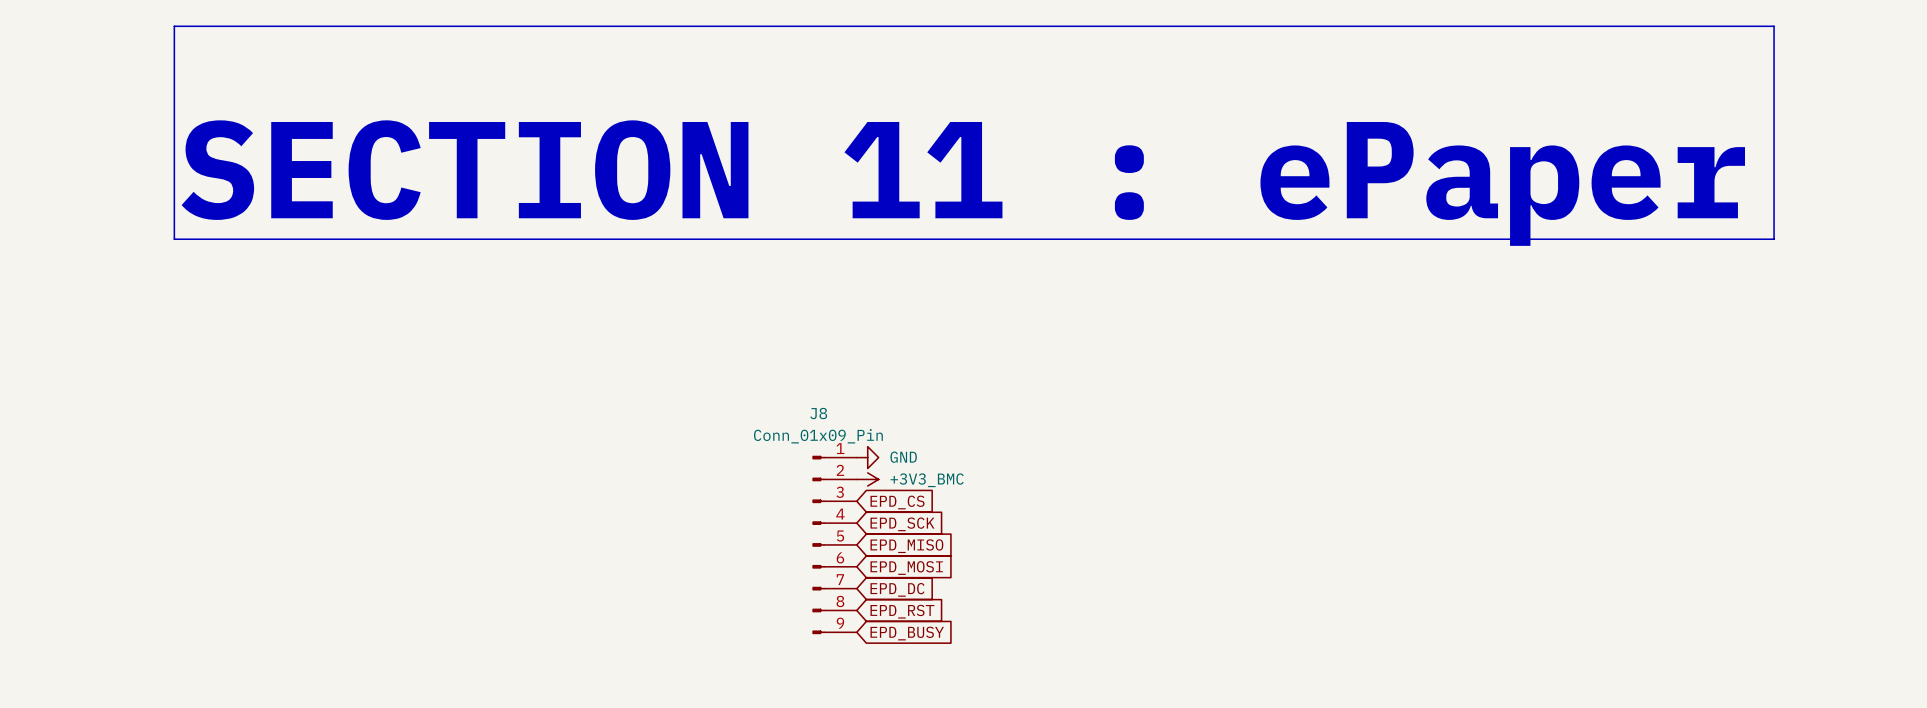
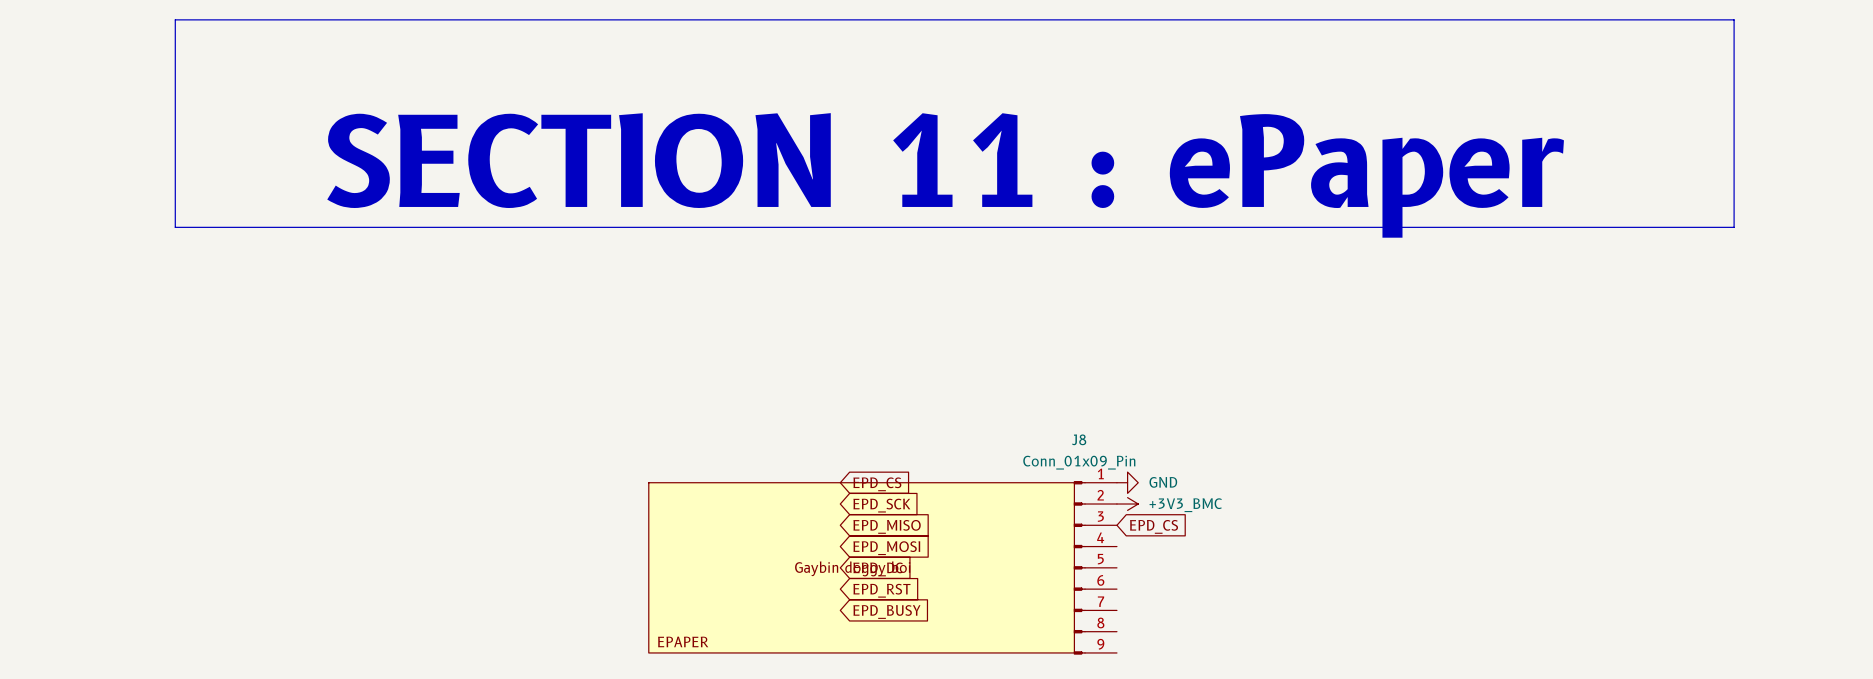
J8 name position: J8 (818, 413) -> J8 (1079, 439)
J8 value position: Conn_01x09_Pin (818, 436) -> Conn_01x09_Pin (1079, 462)
J8 symbol: [812, 455, 857, 635] -> [648, 481, 1117, 655]
power symbol: GND (867, 457) -> none
power symbol: +3V3_BMC (867, 479) -> none
power symbol: none -> GND (1127, 482)
power symbol: none -> +3V3_BMC (1127, 504)
global label: none -> EPD_CS (1154, 526)

